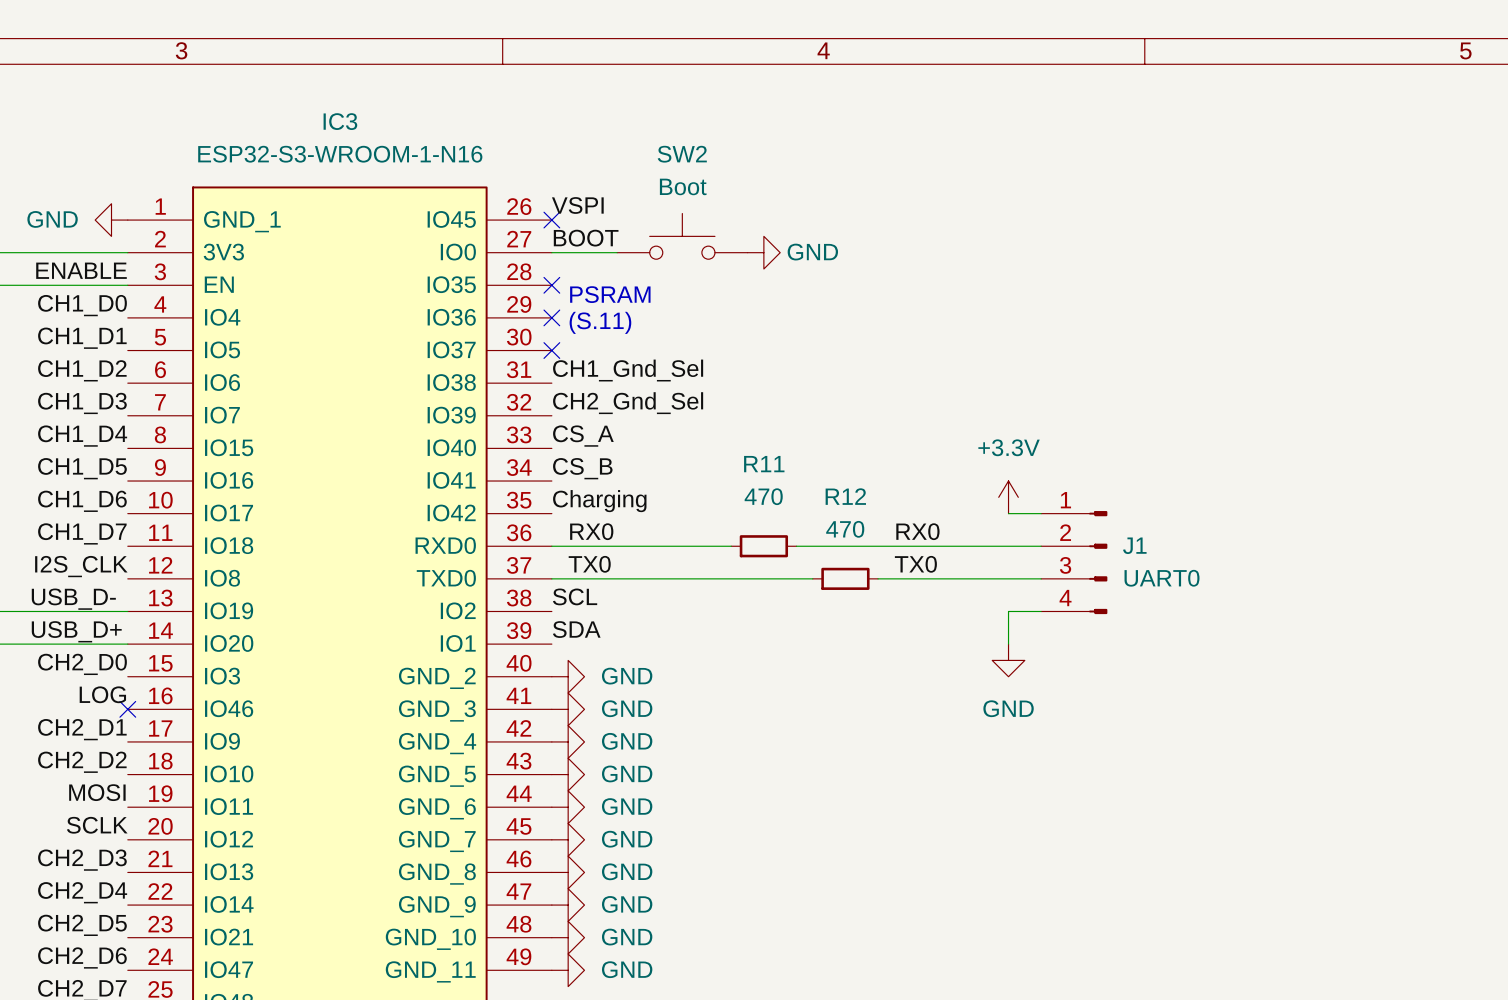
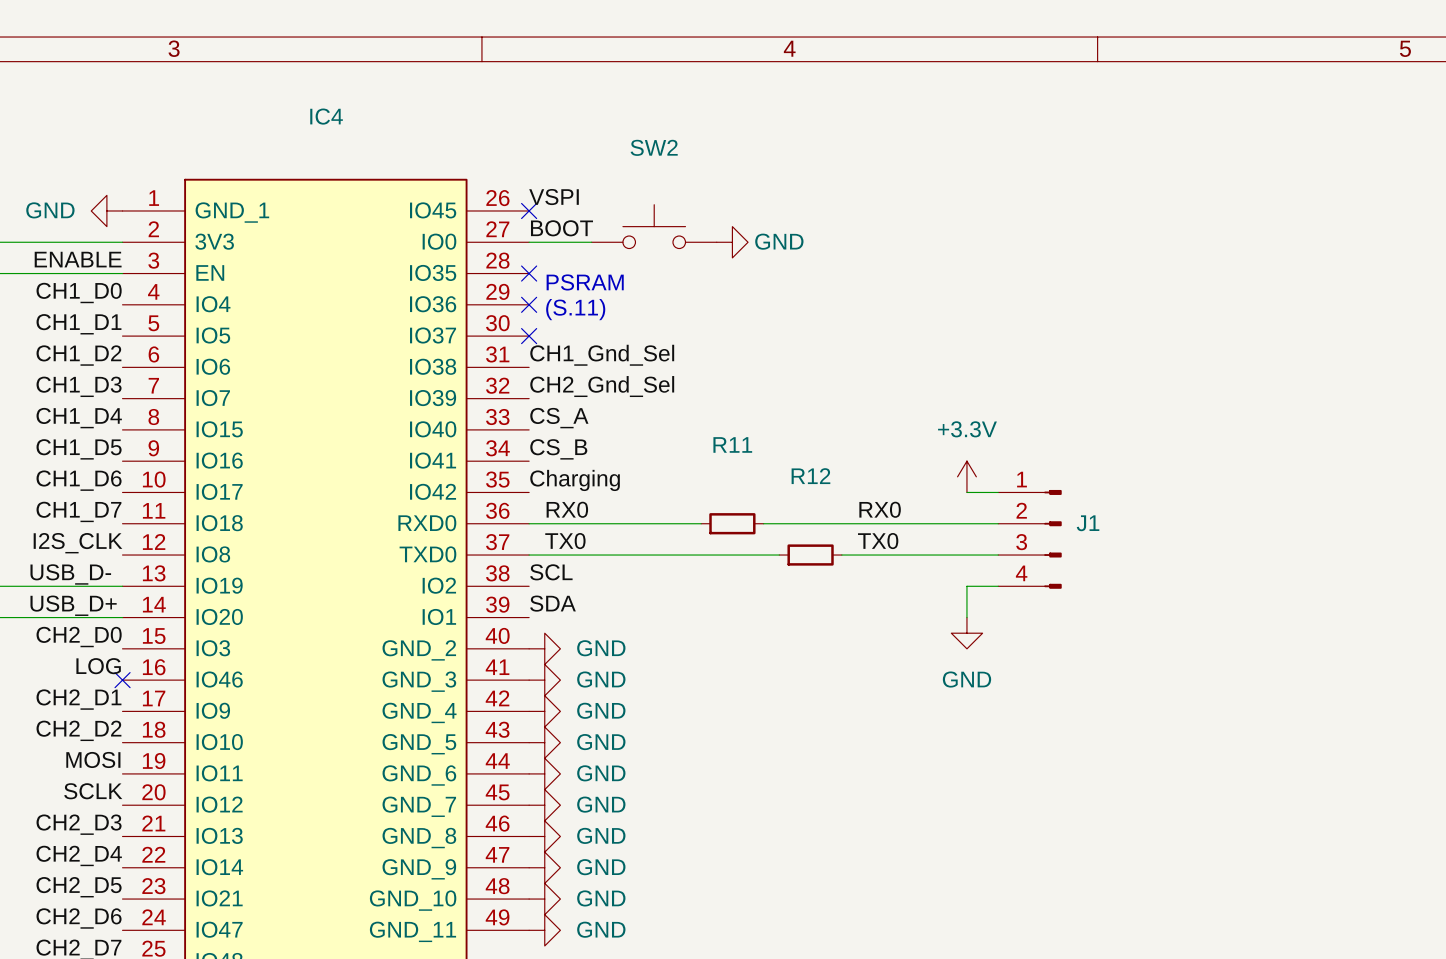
IC3 name: IC3 (340, 121) -> IC4 (326, 116)
IC3 value: ESP32-S3-WROOM-1-N16 (340, 154) -> none
SW2 value: Boot (683, 186) -> none
R11 value: 470 (763, 496) -> none
R12 value: 470 (845, 529) -> none
J1 value: UART0 (1162, 578) -> none

